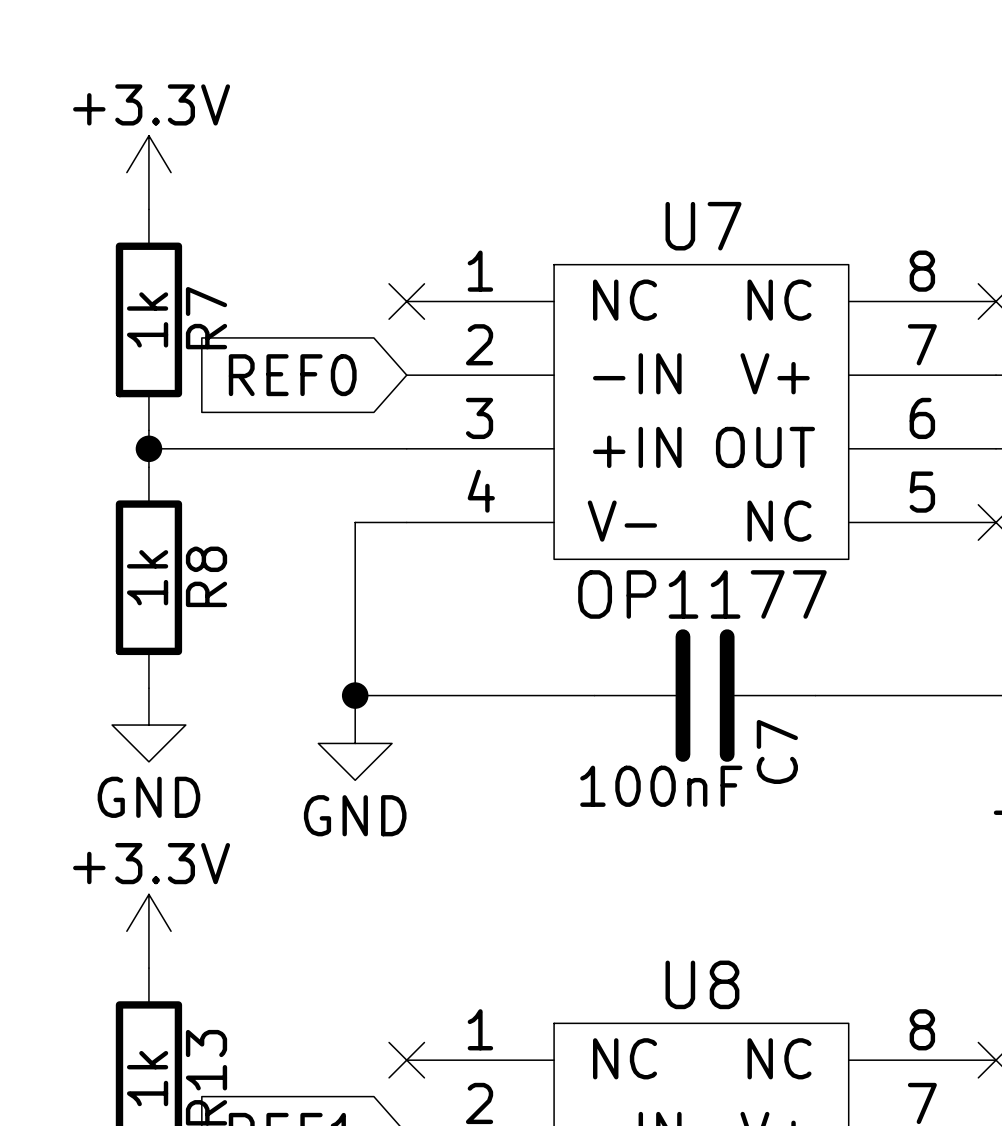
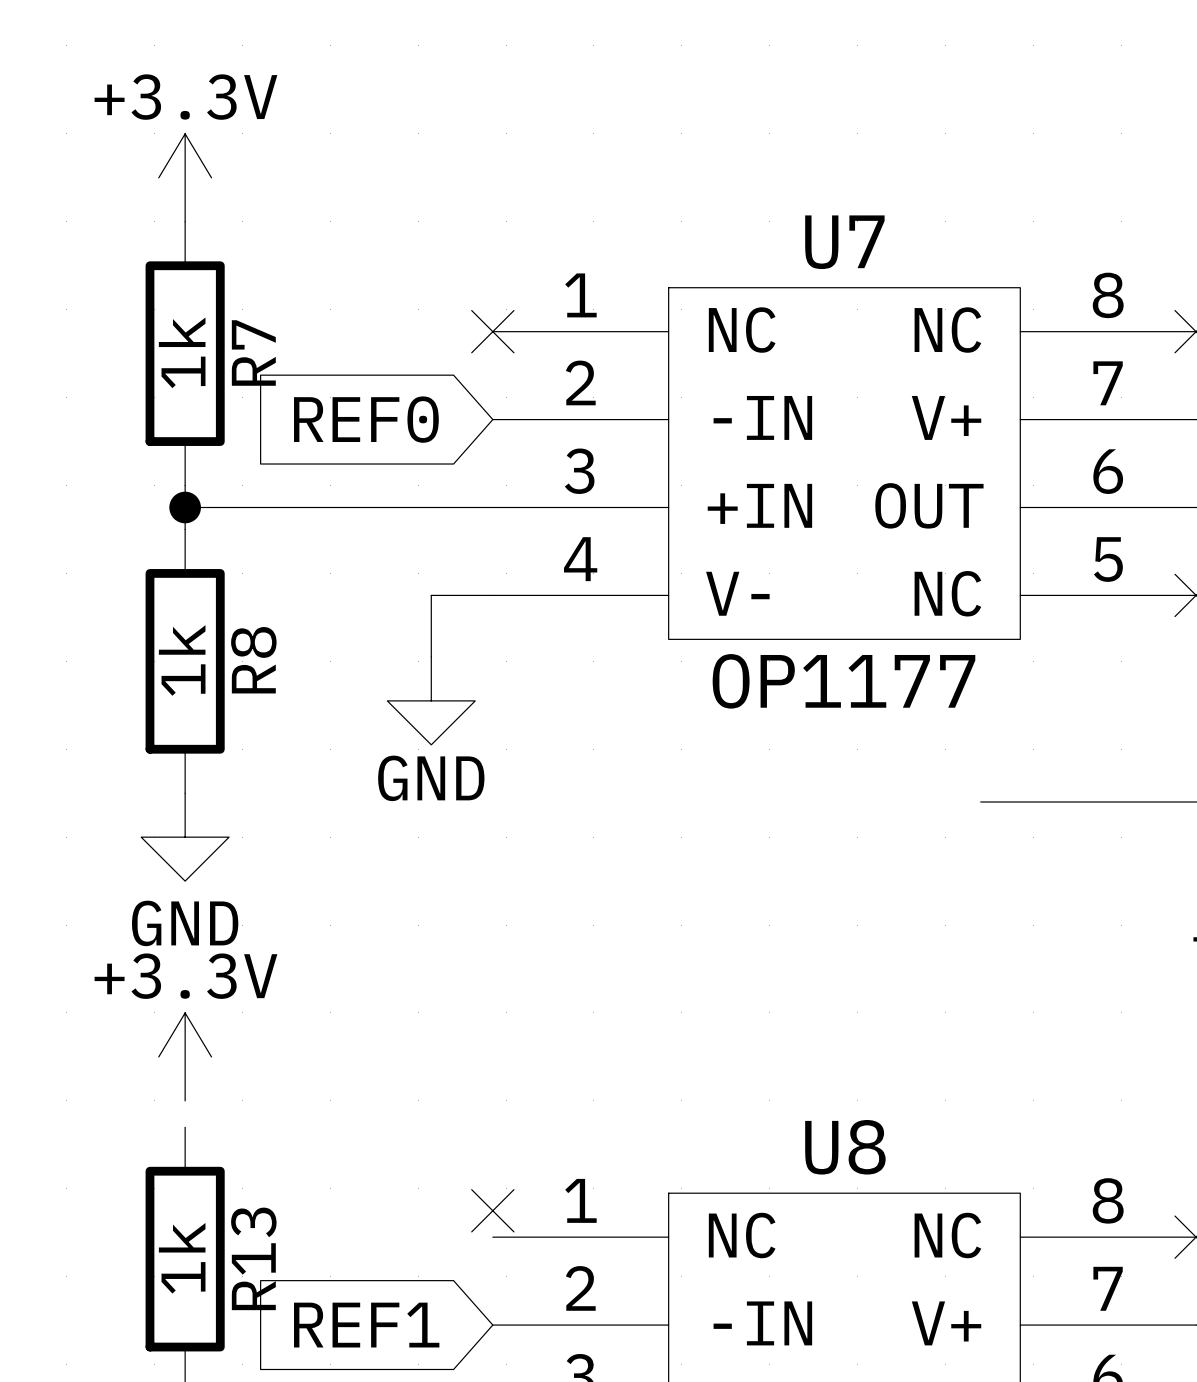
wire: (355, 574) (355, 706) -> none
wire: (355, 695) (594, 695) -> none
junction: (355, 695) -> none
C7: 100nF (705, 695) -> none
power symbol position: GND (355, 743) -> GND (431, 700)
power symbol text position: GND (355, 815) -> GND (431, 778)
power symbol position: +3.3V (148, 931) -> +3.3V (185, 1056)
no-connect mark position: (406, 1060) -> (492, 1210)

